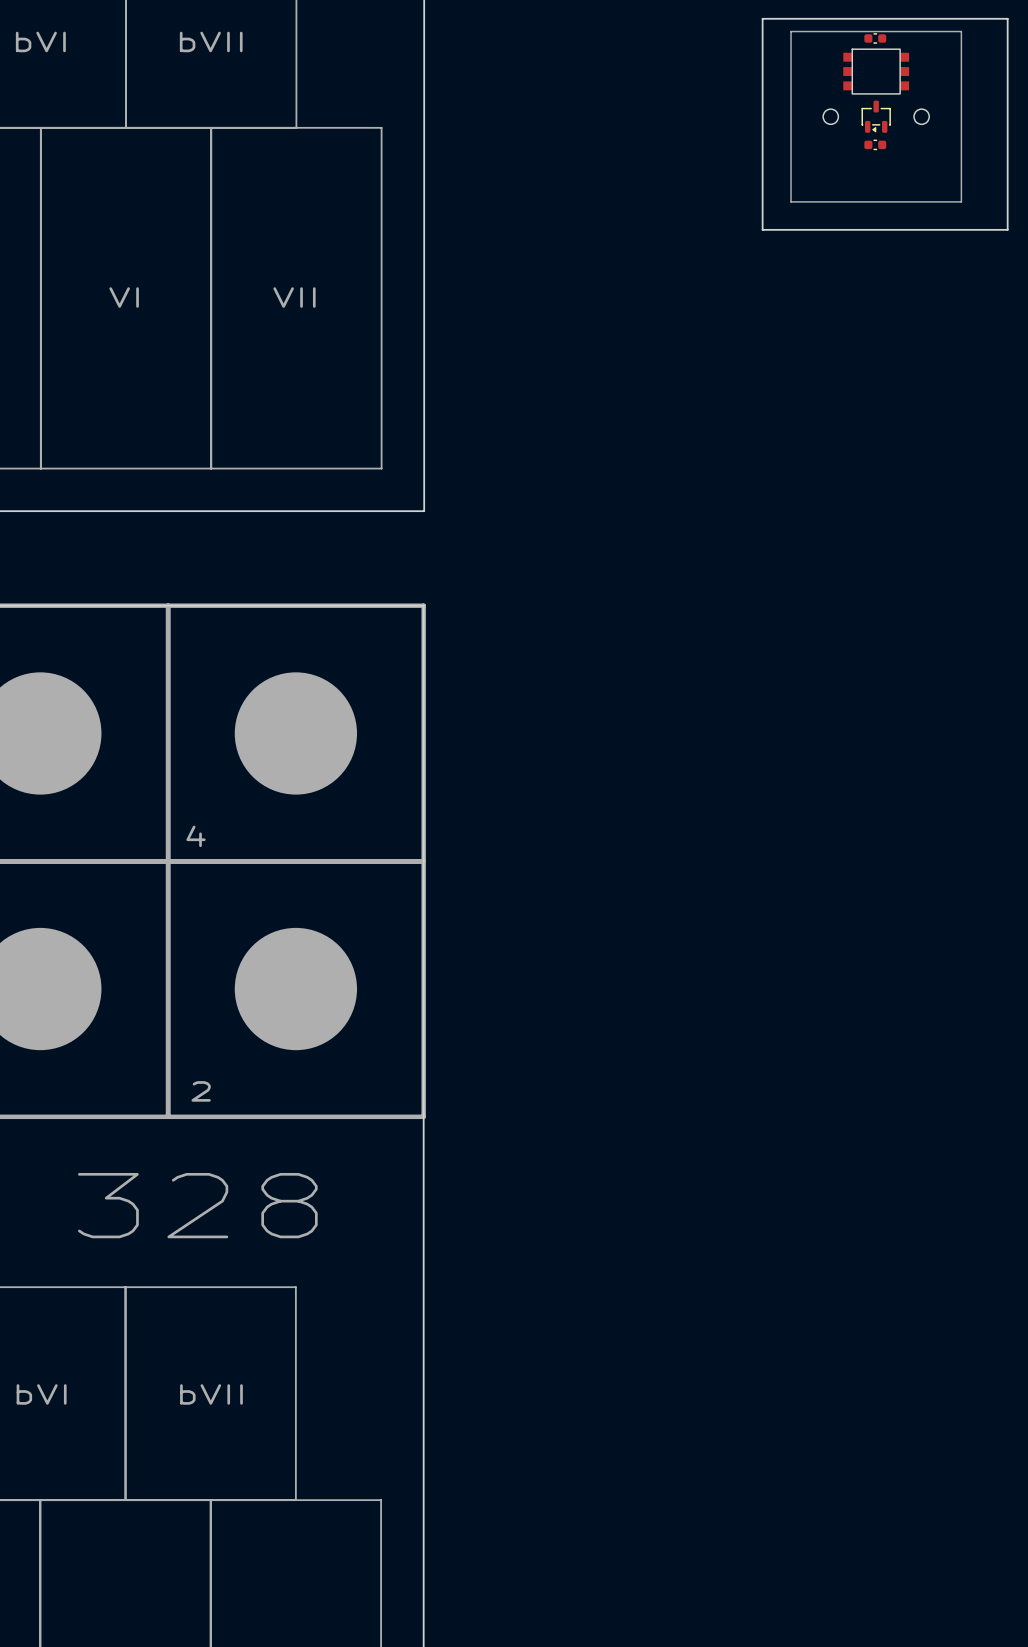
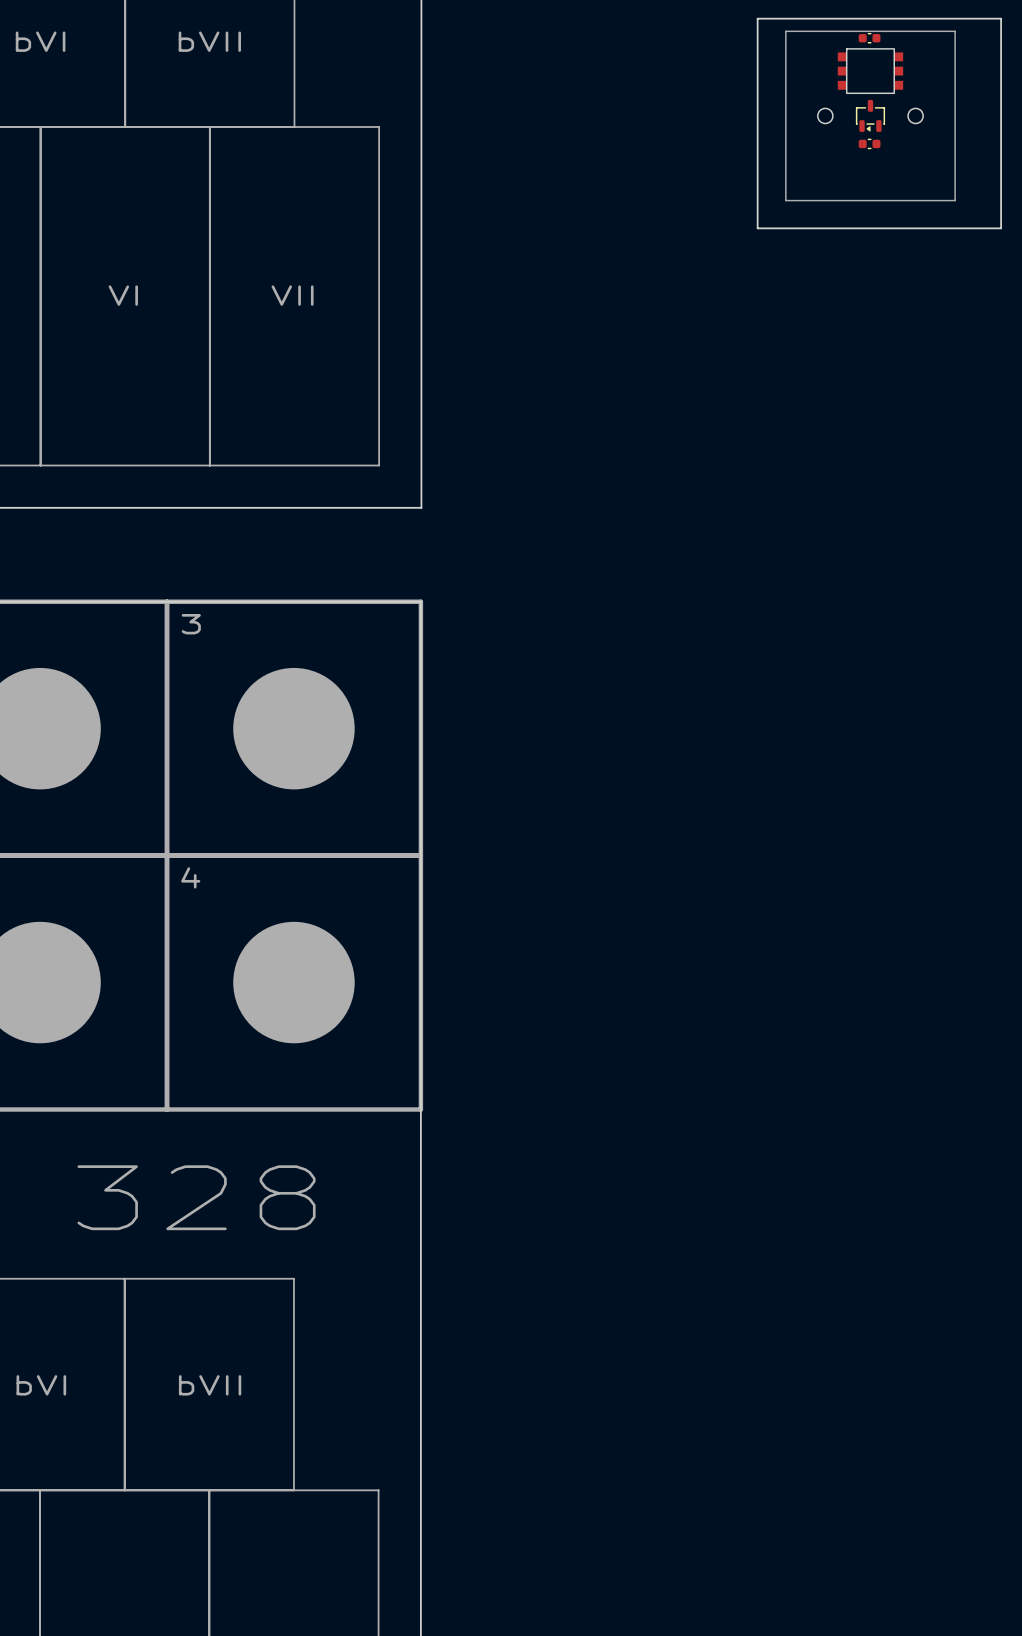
text: none -> 3 (191, 624)
text position: 4 (196, 836) -> 4 (190, 877)
text: 2 (201, 1091) -> none

